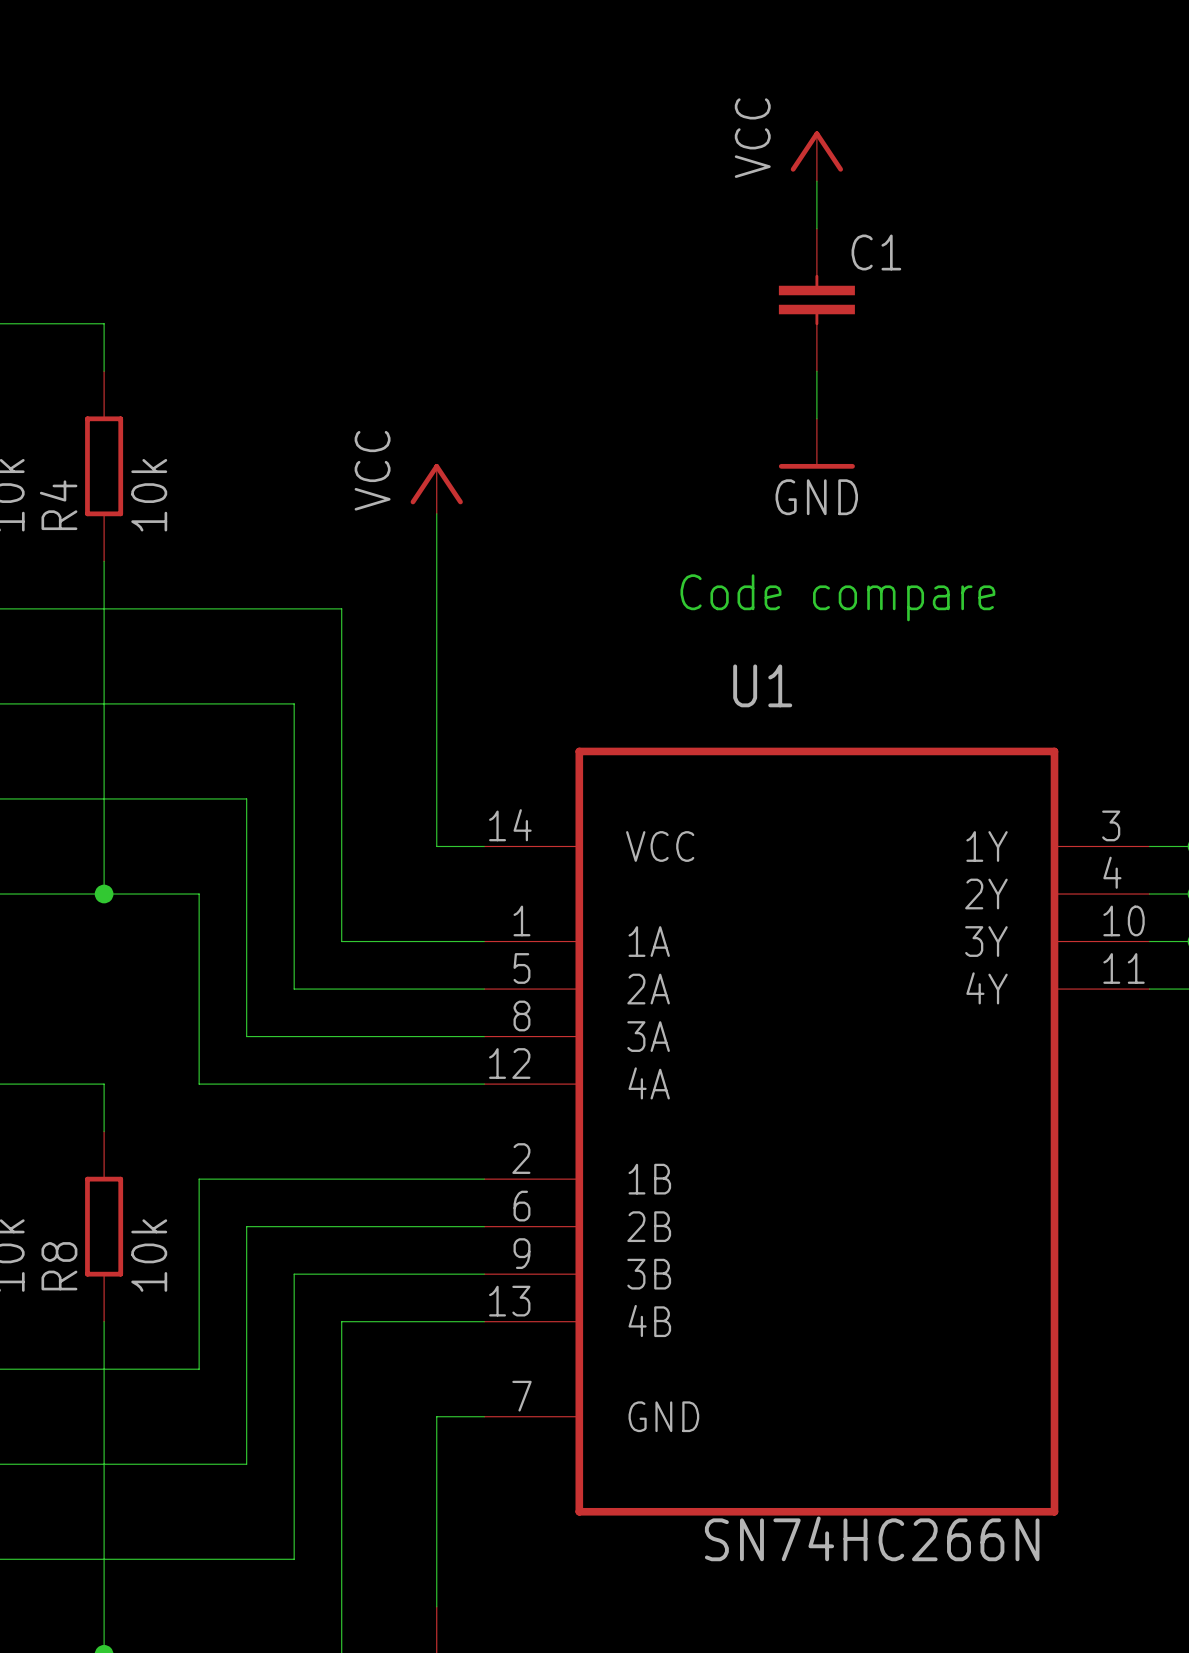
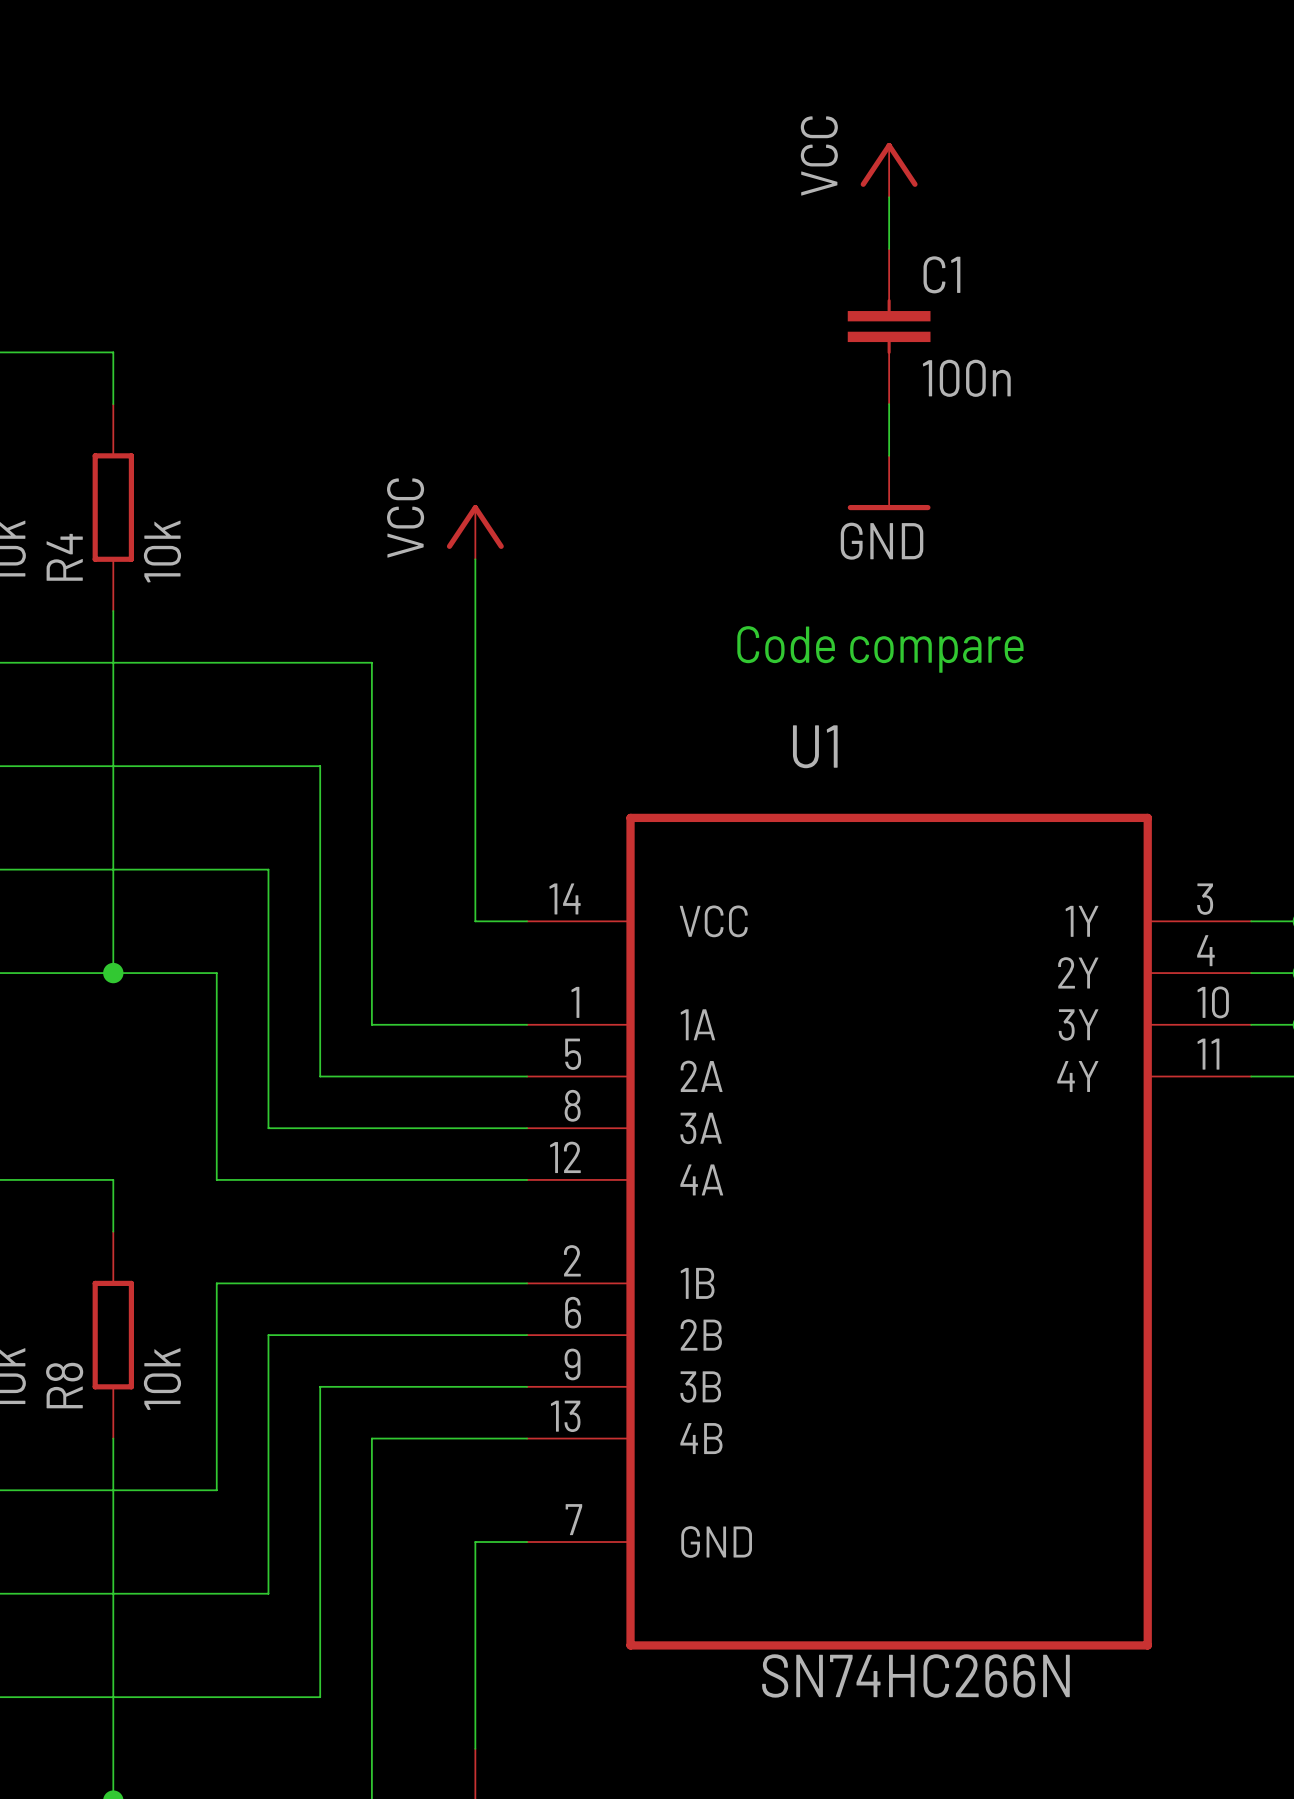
C1 value: none -> 100n (966, 378)

